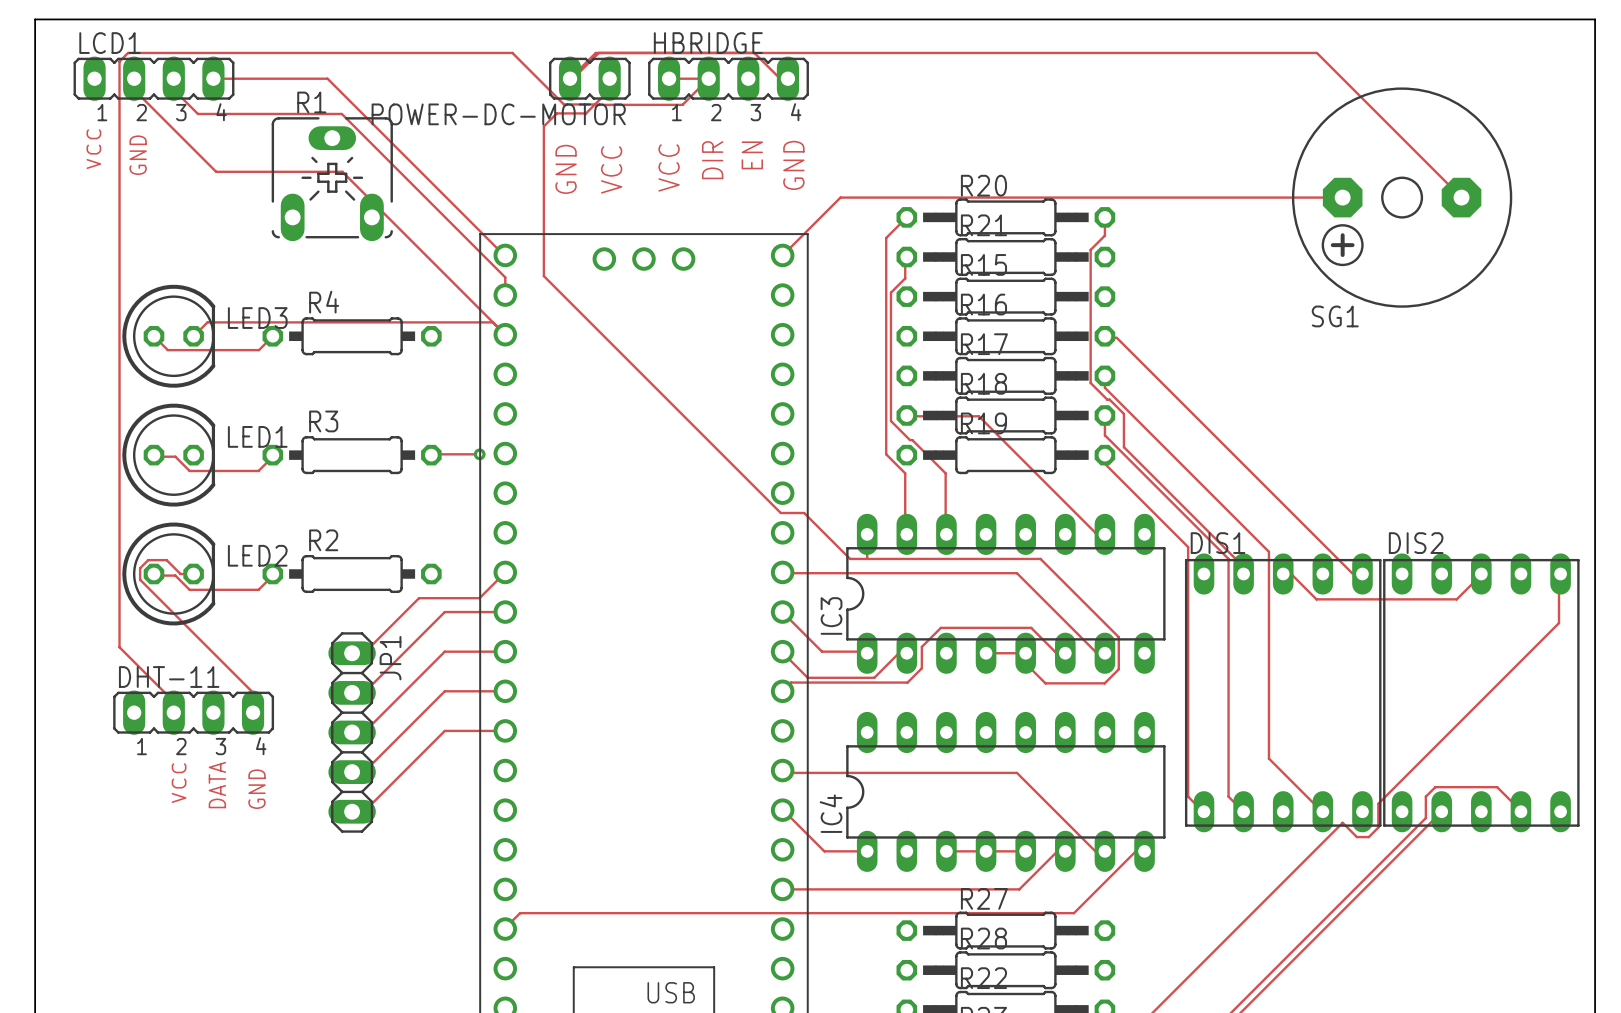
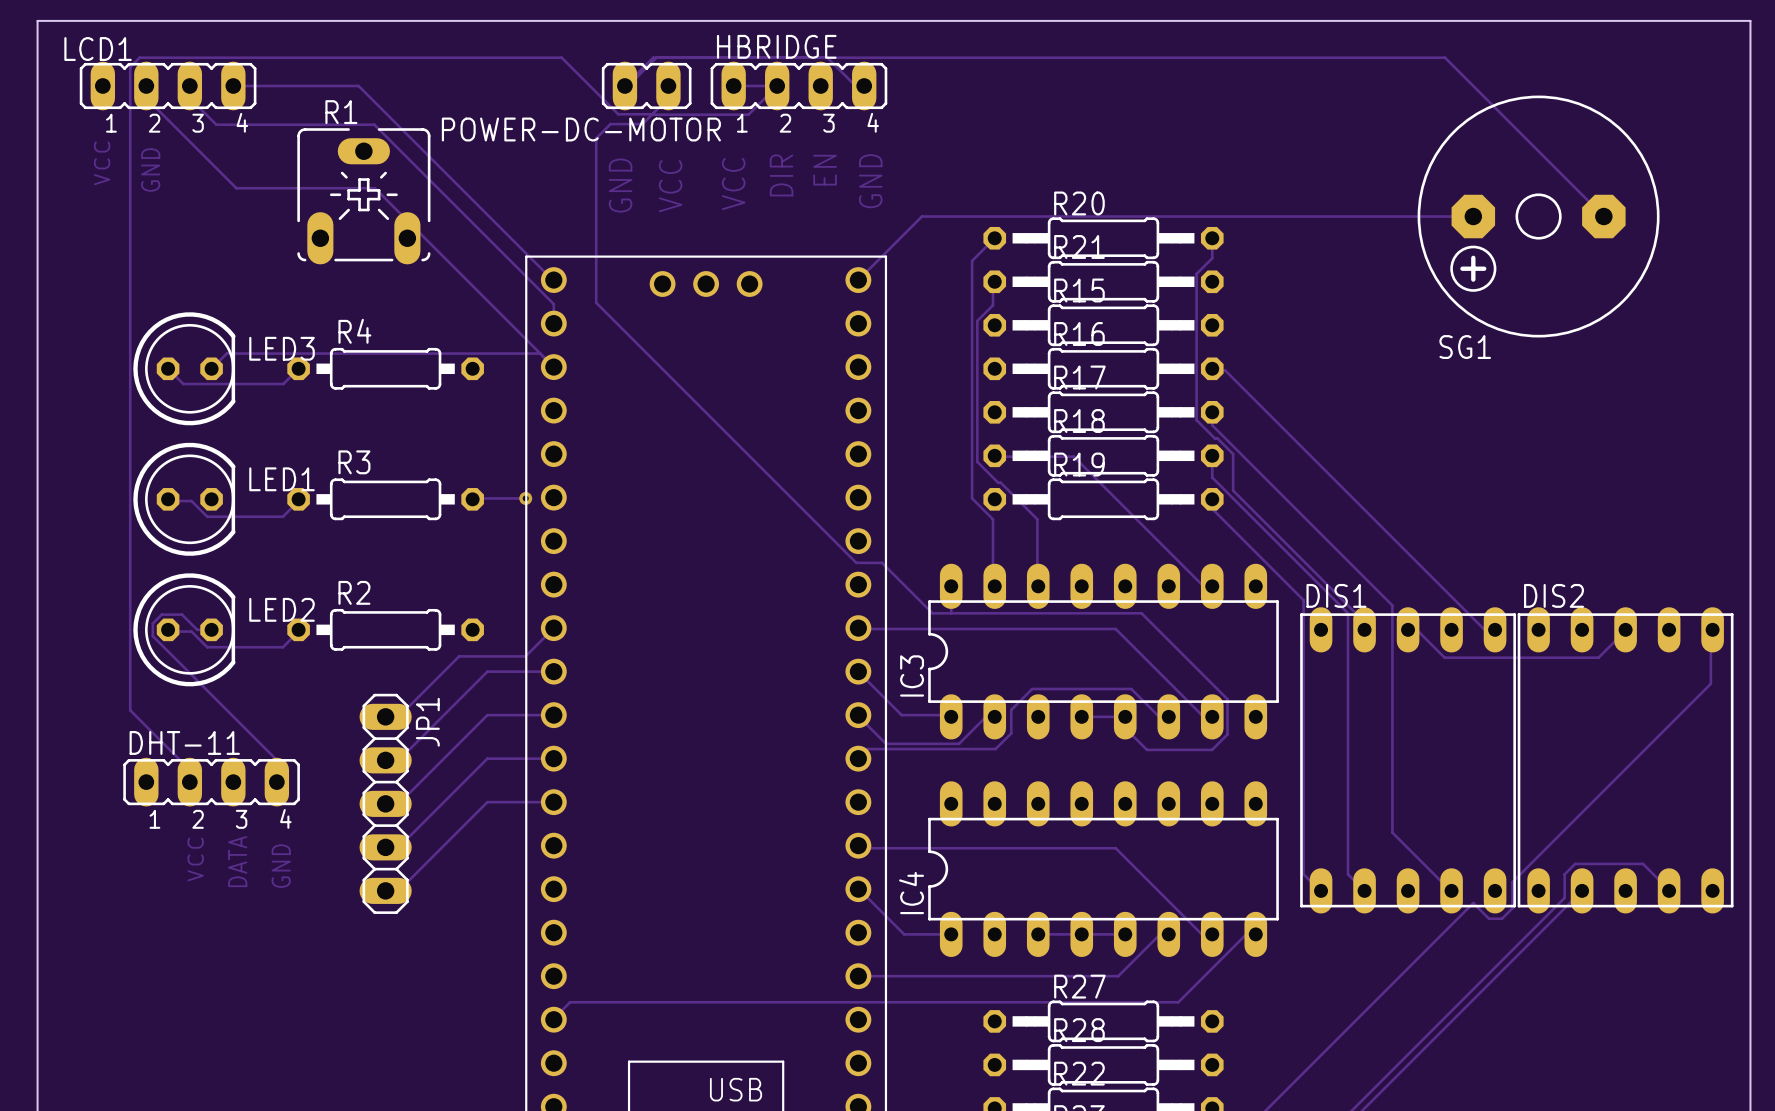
LCD1 name position: LCD1 (110, 43) -> LCD1 (98, 49)
POWER-DC-MOTOR name position: POWER-DC-MOTOR (498, 114) -> POWER-DC-MOTOR (581, 129)

